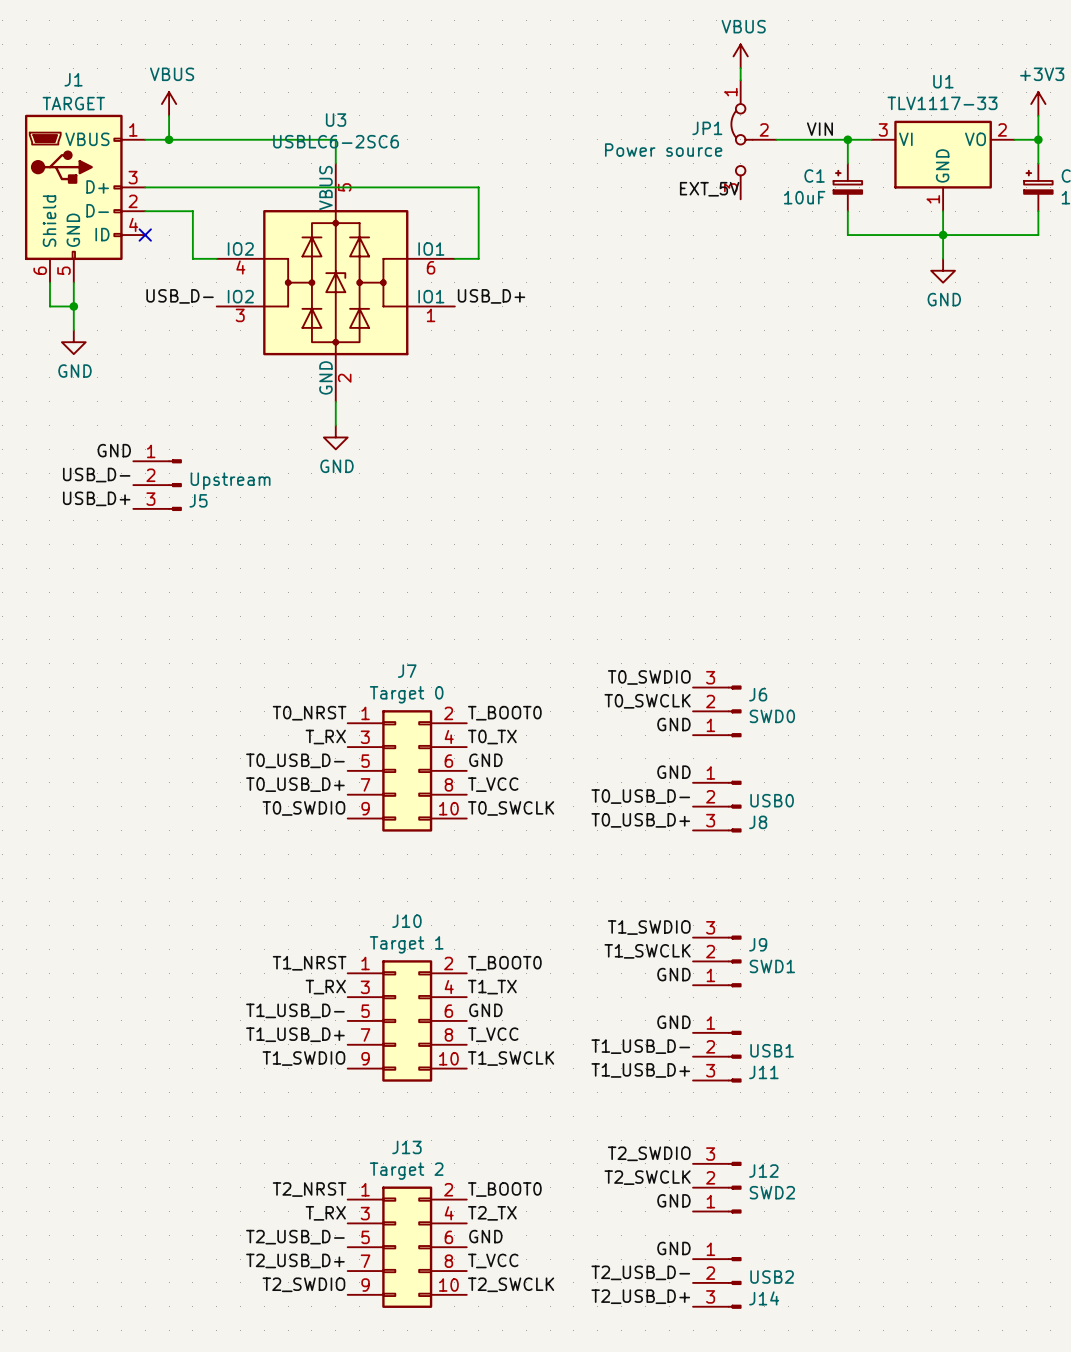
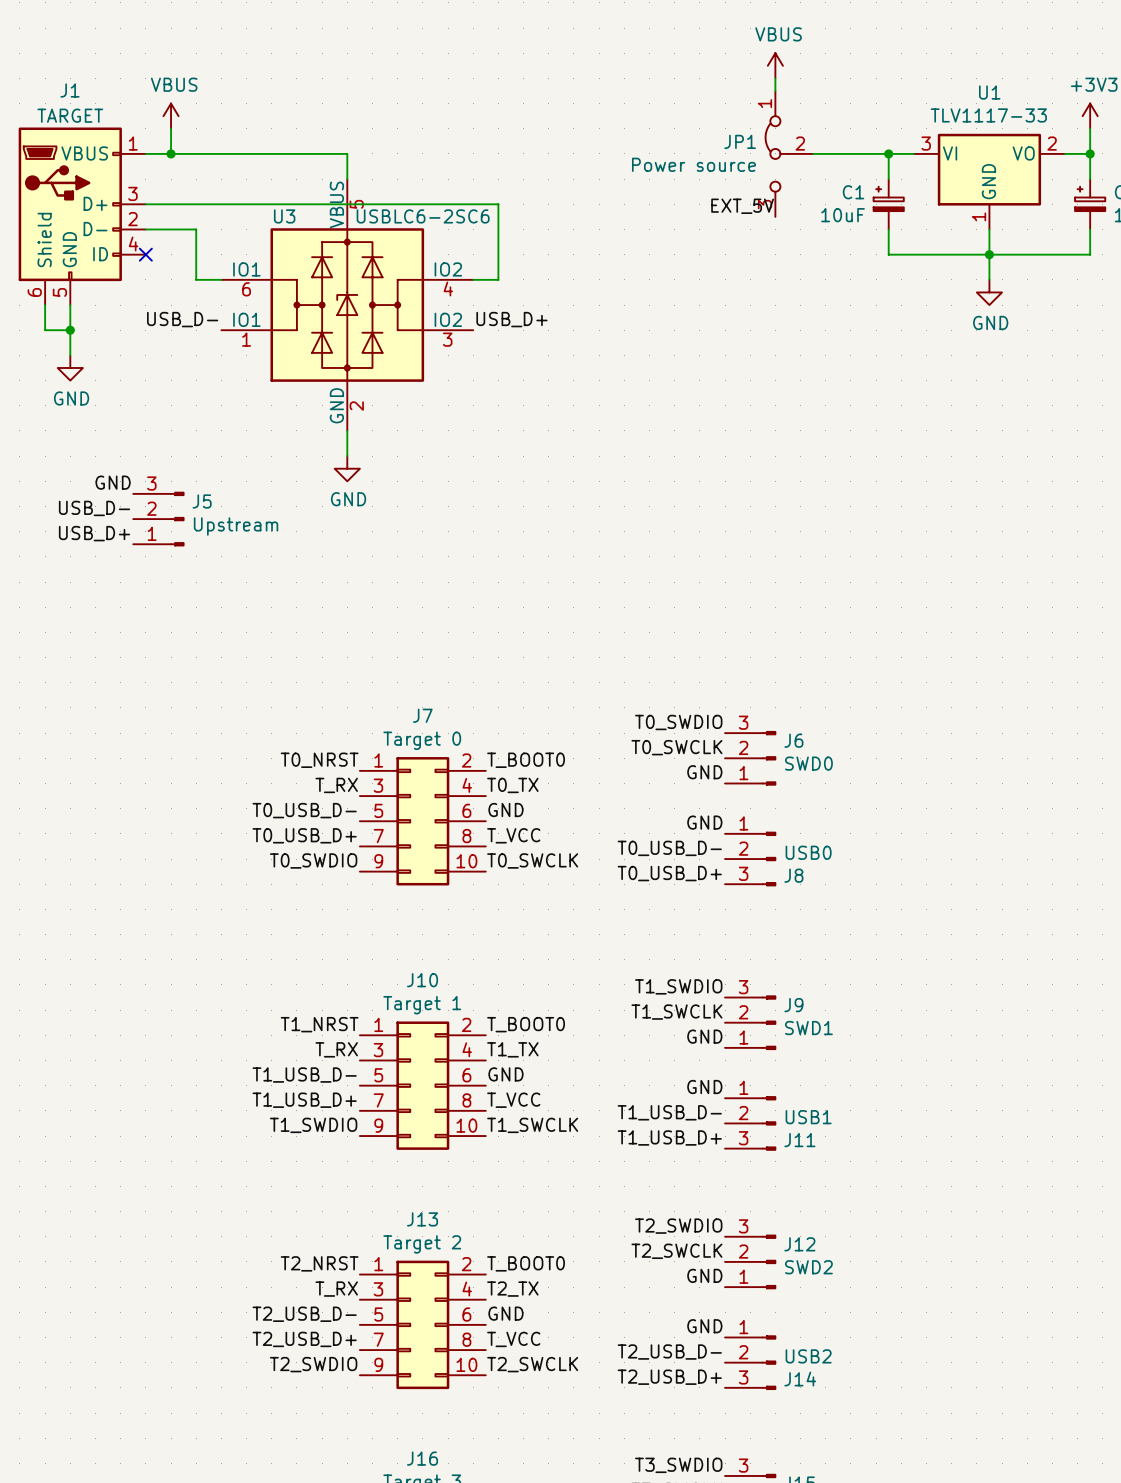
U3 name position: U3 (336, 120) -> U3 (284, 216)
label: VIN (819, 129) -> none
U3 value position: USBLC6-2SC6 (336, 141) -> USBLC6-2SC6 (423, 216)
U3 flip: as is (335, 282) -> left-right (347, 305)
J5 flip: as is (175, 485) -> up-down (177, 519)

